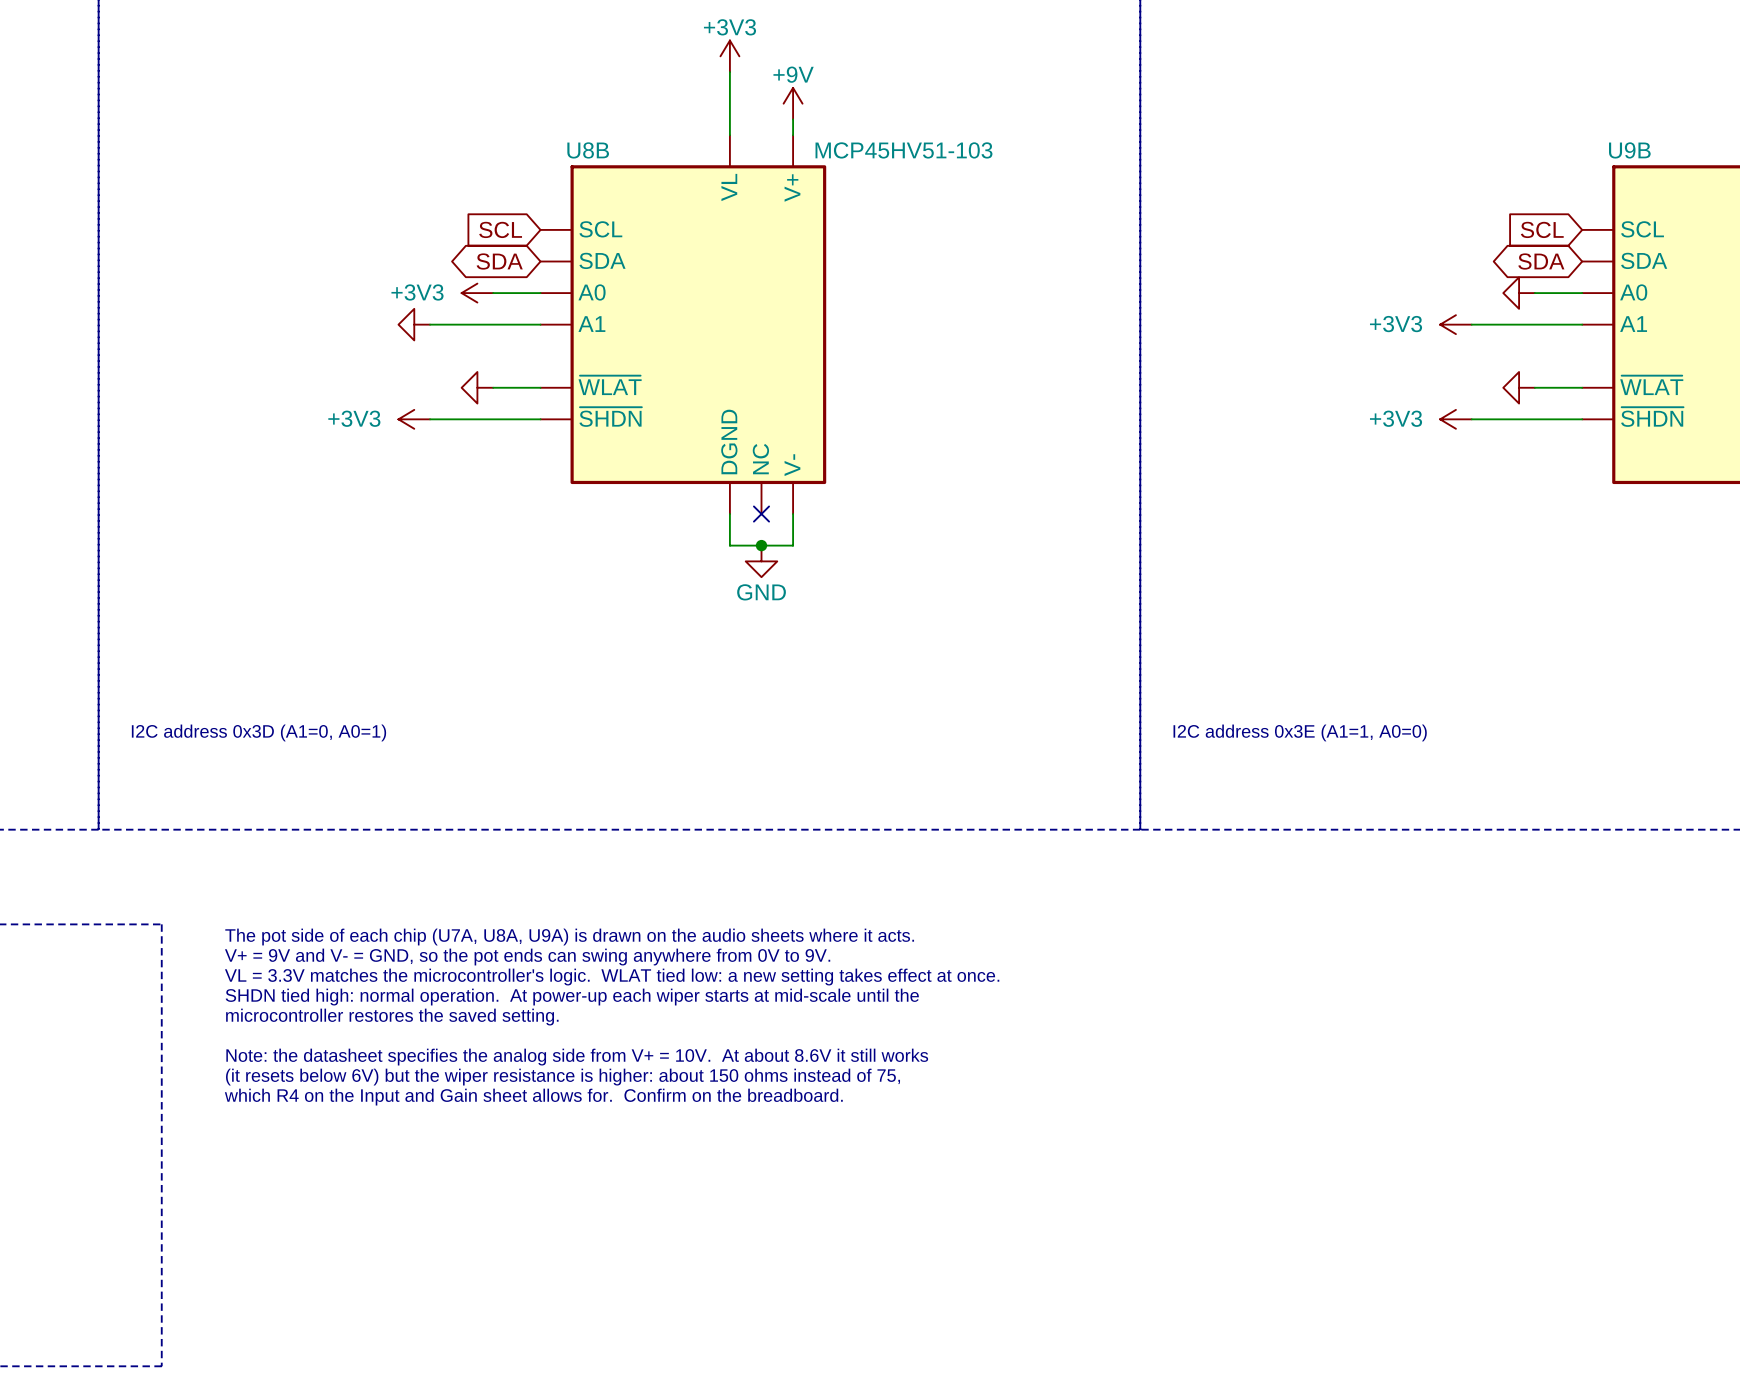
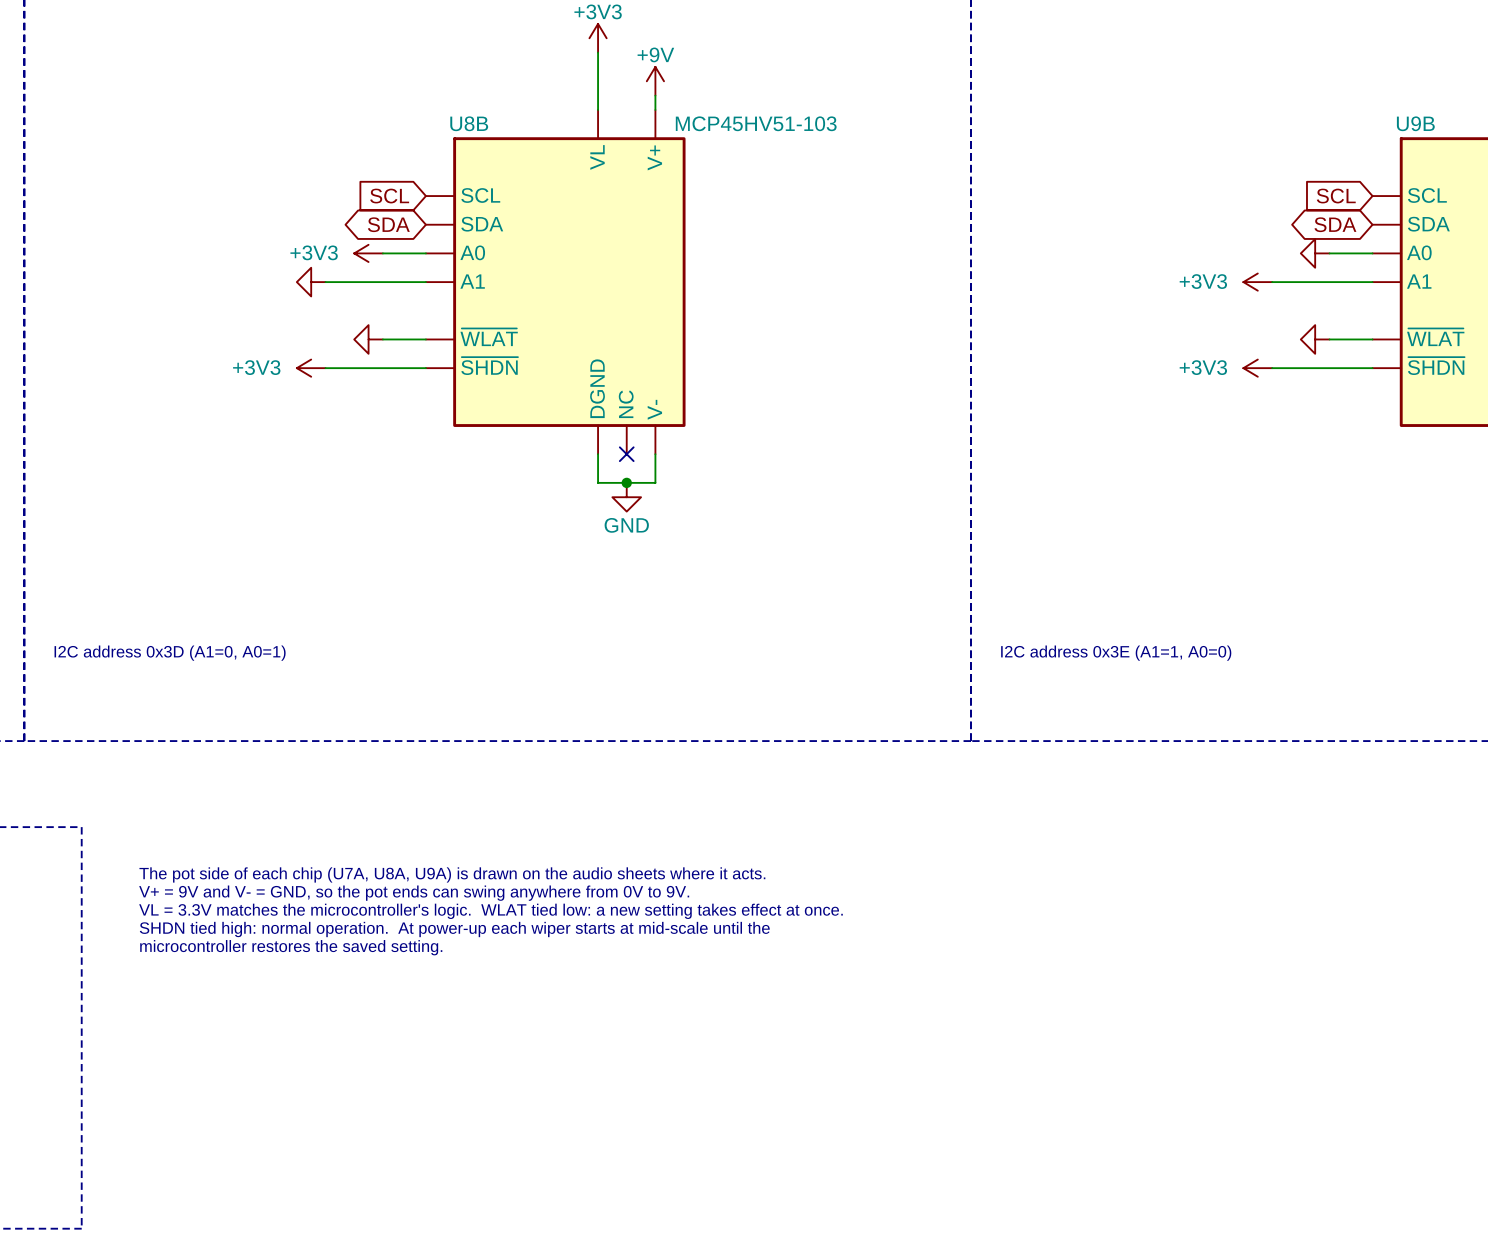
text: The pot side of each chip (U7A, U8A, U9A) is drawn on the audio sheets where it acts. (569, 937) -> none
text: V+ = 9V and V- = GND, so the pot ends can swing anywhere from 0V to 9V. (527, 957) -> none
text: VL = 3.3V matches the microcontroller's logic. WLAT tied low: a new setting takes effect at once. (612, 977) -> The pot side of each chip (U7A, U8A, U9A) is drawn on the audio sheets where it acts. (452, 874)
text: SHDN tied high: normal operation. At power-up each wiper starts at mid-scale until the (572, 997) -> V+ = 9V and V- = GND, so the pot ends can swing anywhere from 0V to 9V. (414, 893)
text: microcontroller restores the saved setting. (392, 1017) -> VL = 3.3V matches the microcontroller's logic. WLAT tied low: a new setting takes effect at once. (490, 911)
text: none -> SHDN tied high: normal operation. At power-up each wiper starts at mid-scale until the (454, 929)
text: Note: the datasheet specifies the analog side from V+ = 10V. At about 8.6V it still works (577, 1057) -> microcontroller restores the saved setting. (291, 947)
text: (it resets below 6V) but the wiper resistance is higher: about 150 ohms instead of 75, (563, 1077) -> none
text: which R4 on the Input and Gain sheet allows for. Confirm on the breadboard. (533, 1097) -> none

